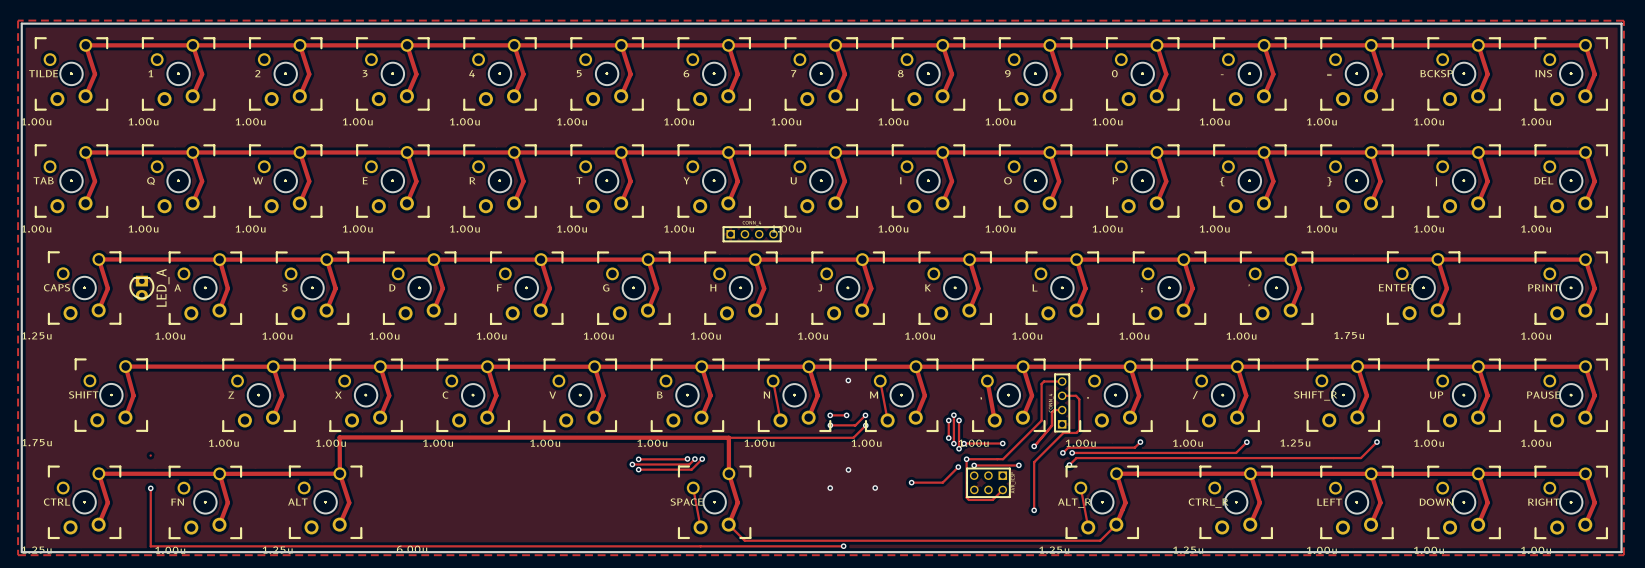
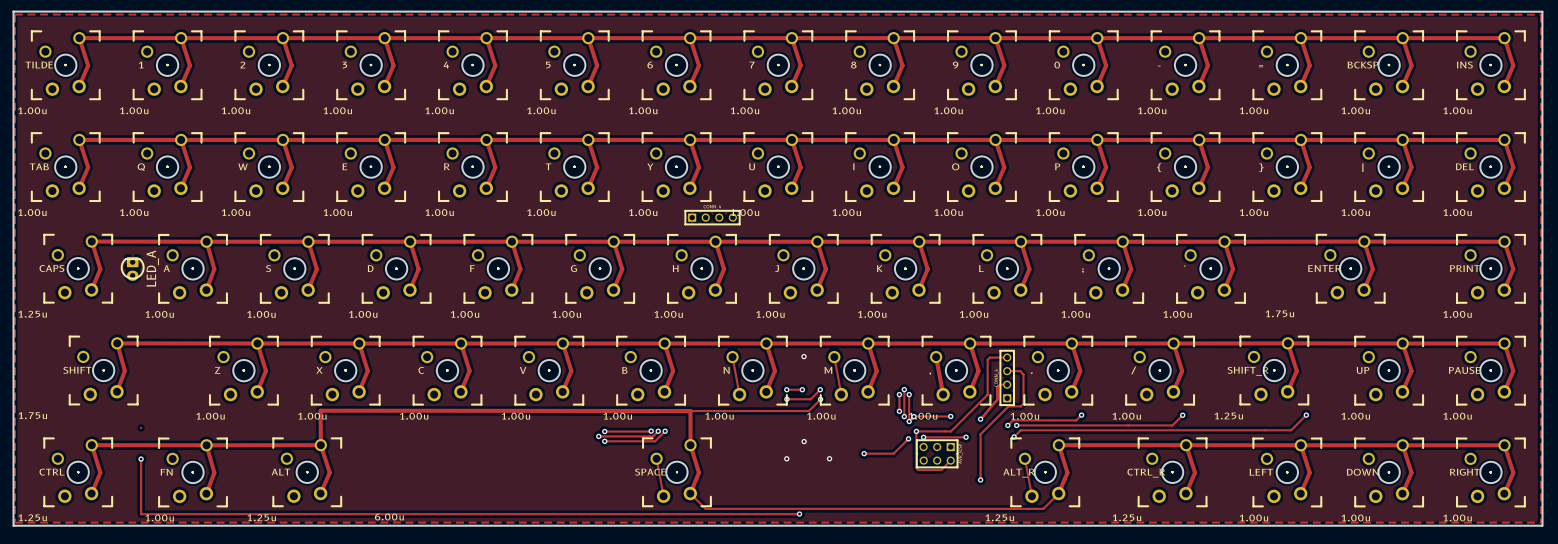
board edge: (21, 23) (21, 552) (1621, 552) (1621, 23) (21, 23) -> none
board edge: none -> (13, 525) (13, 11) (1542, 11) (1542, 525)
board edge: none -> (13, 525) (1542, 525)

